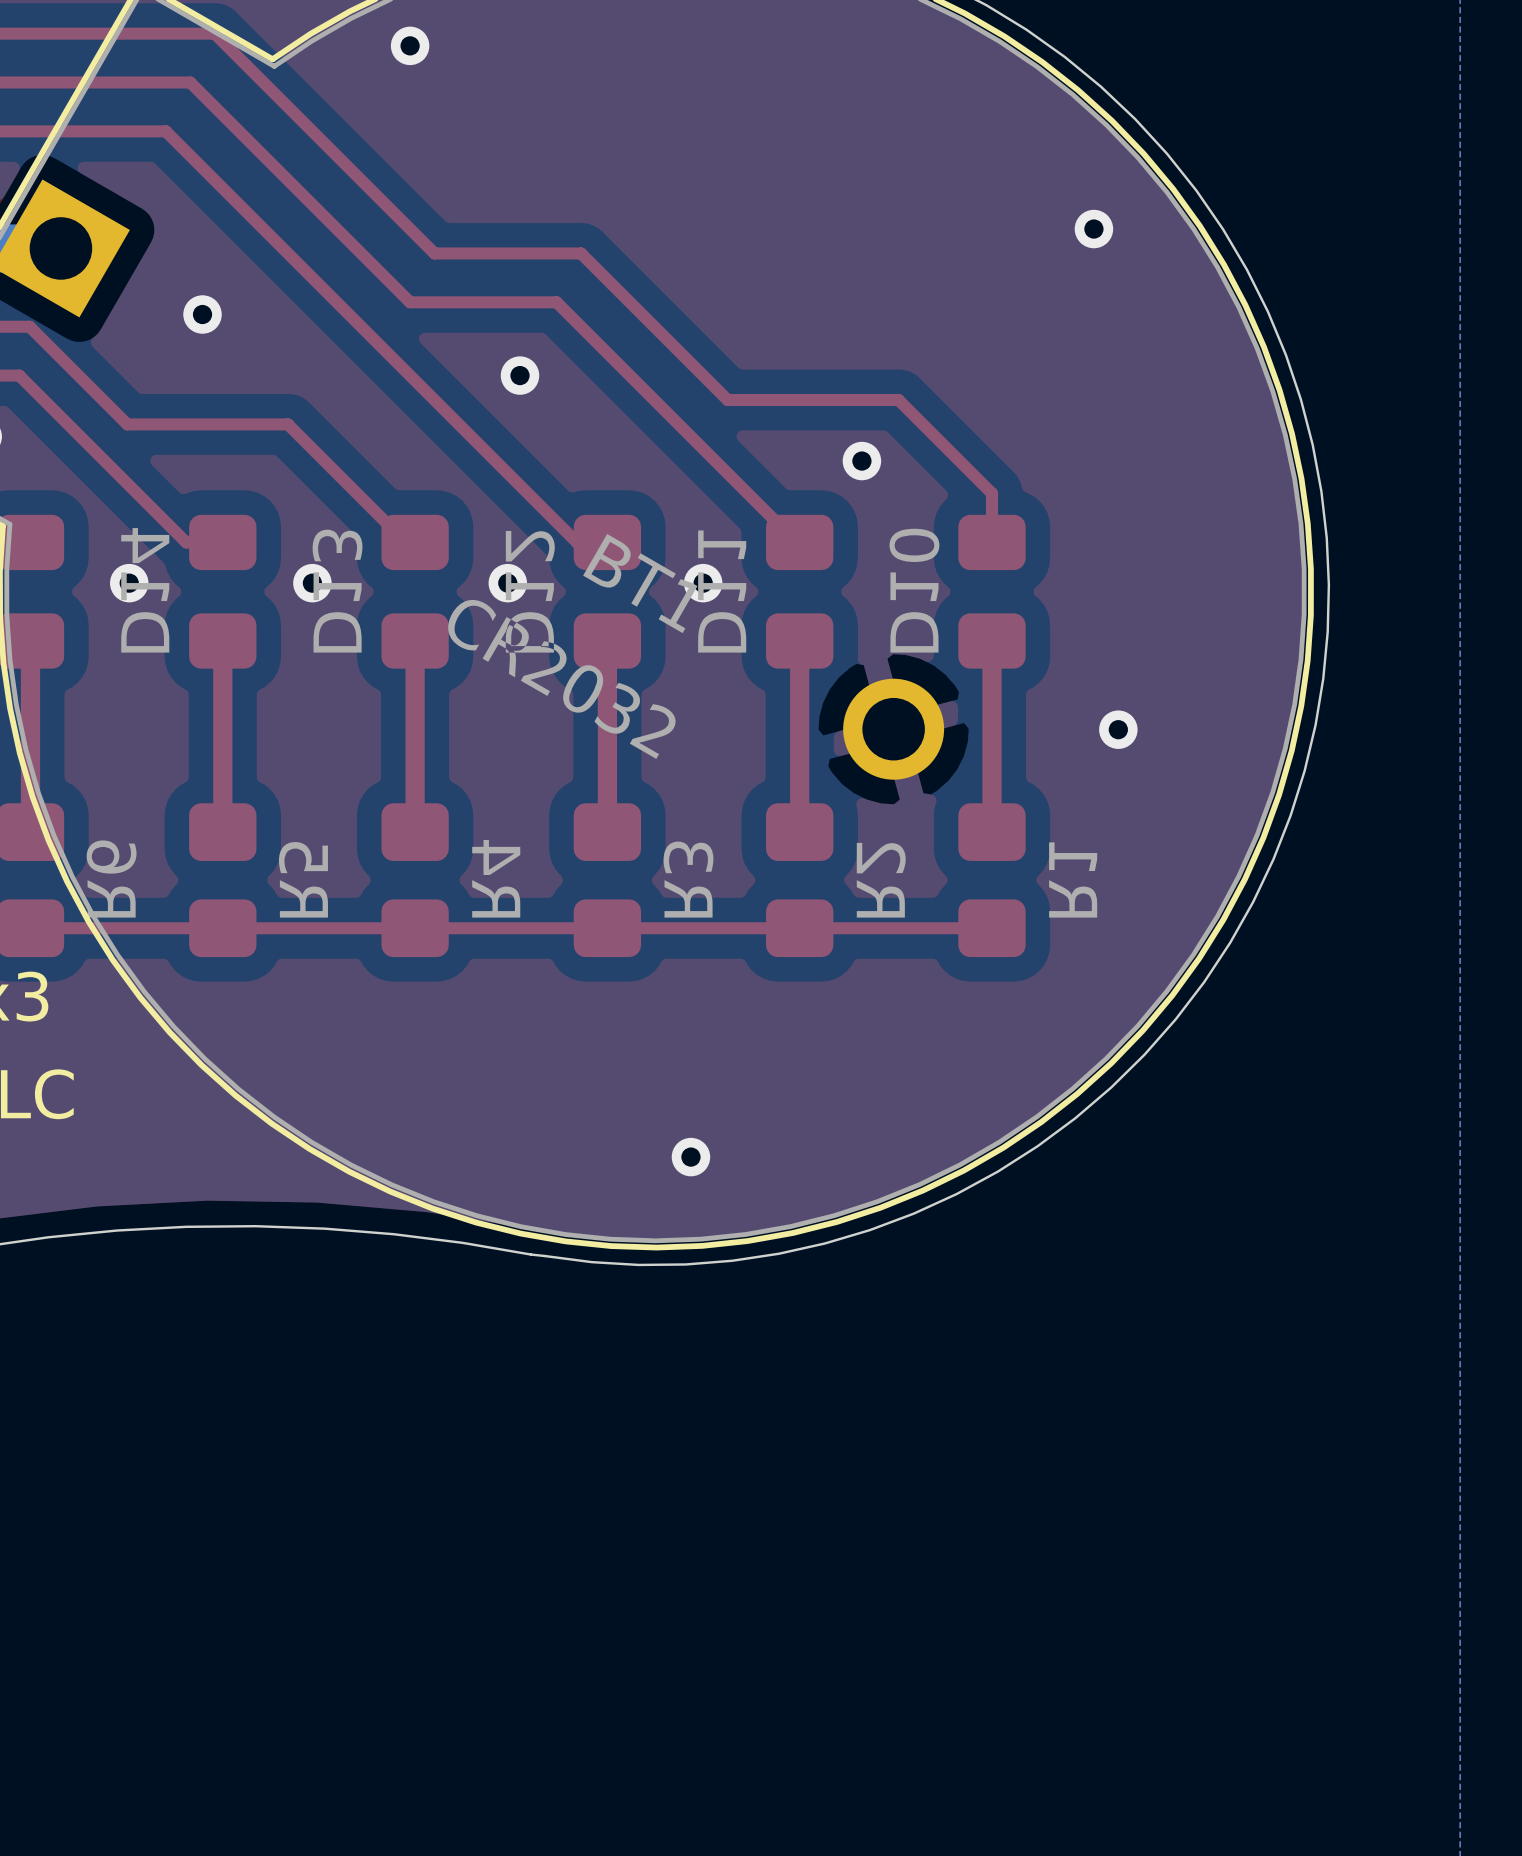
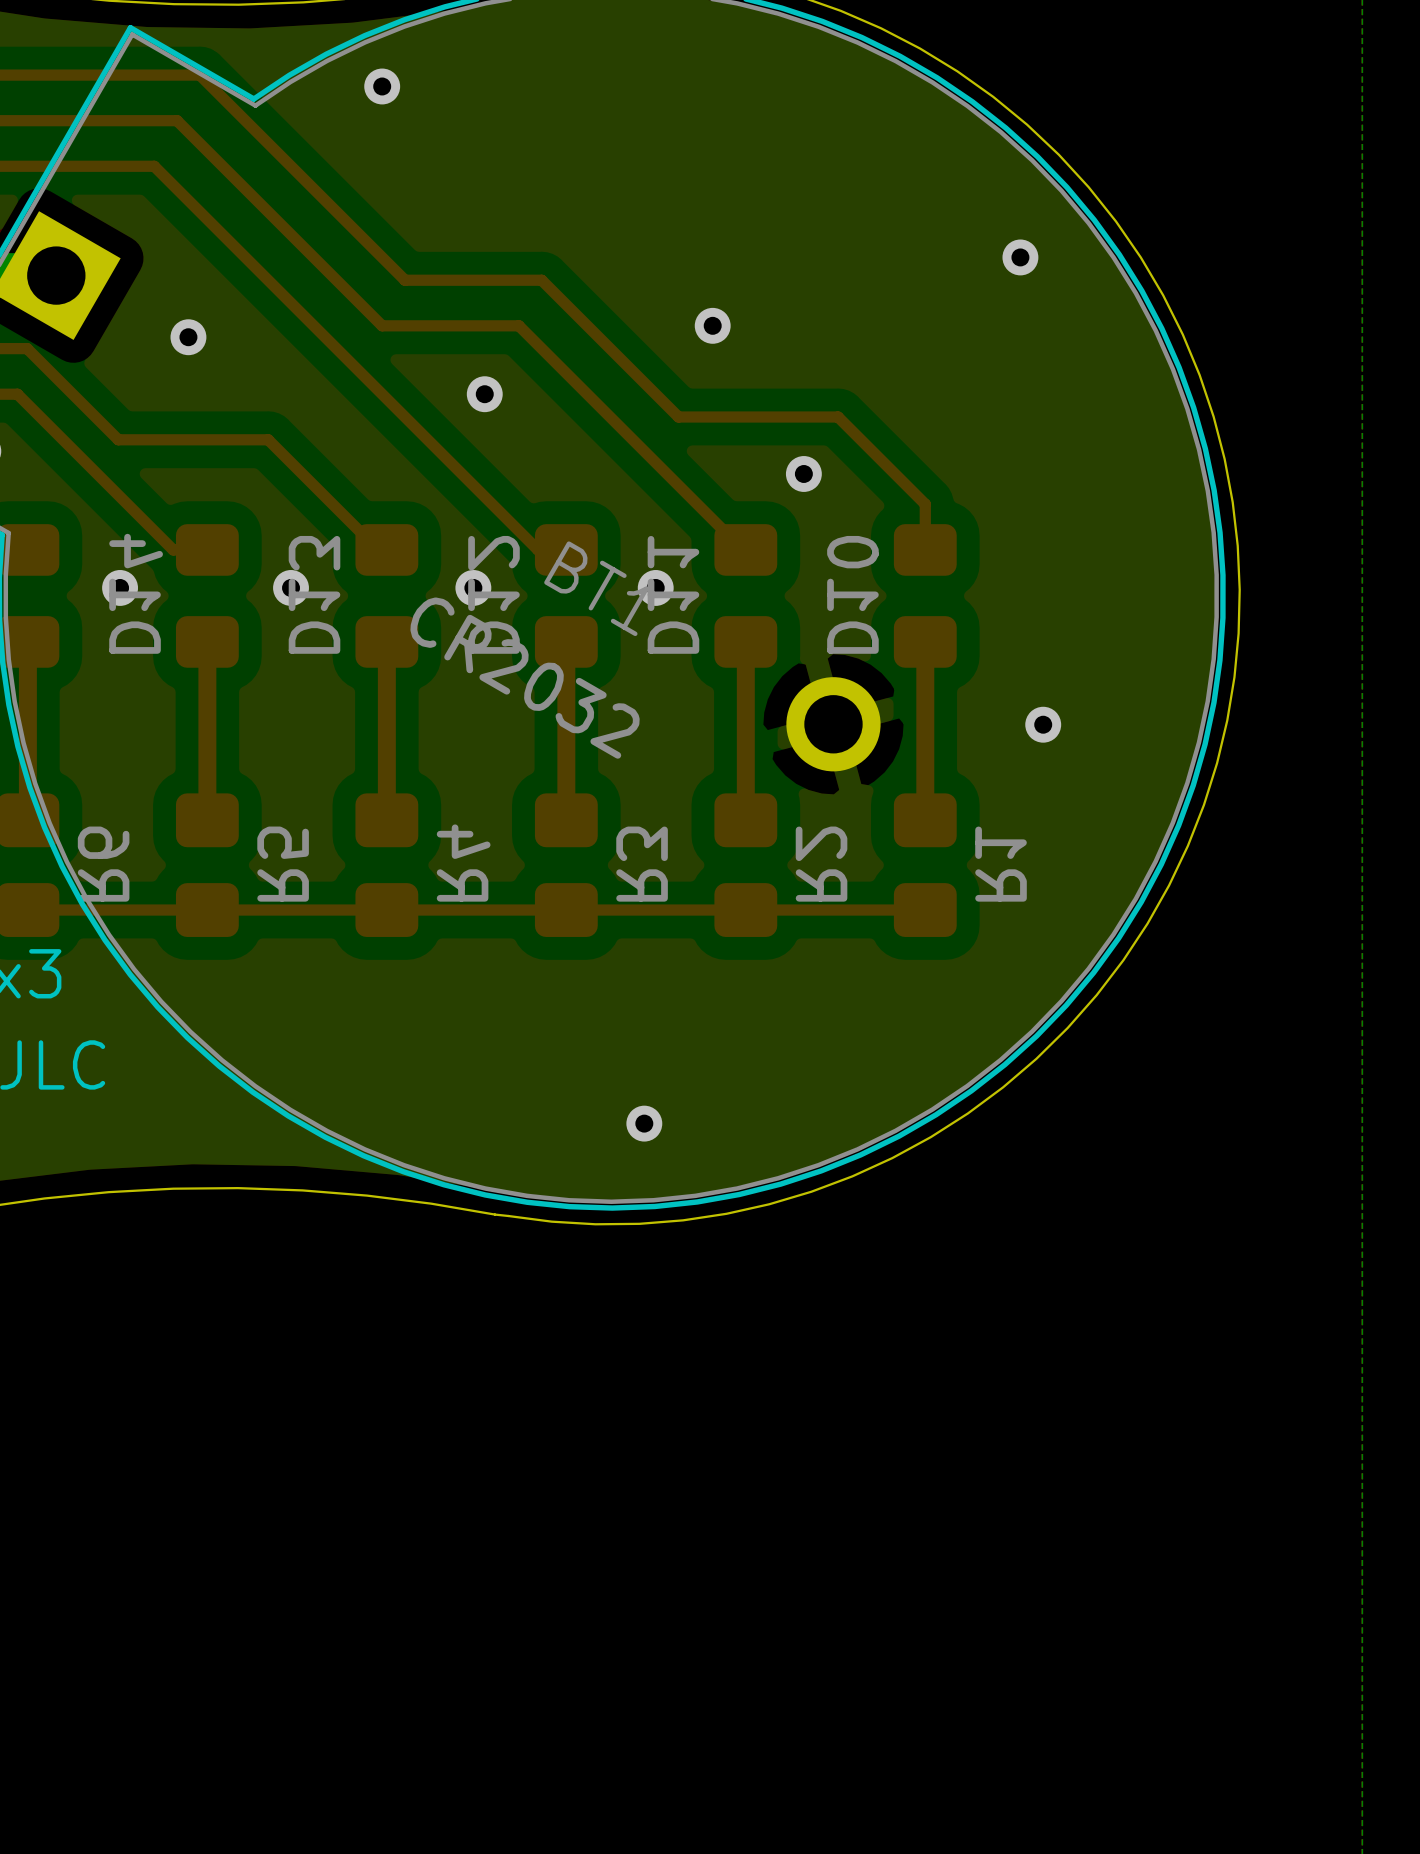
via: none -> (712, 325)

